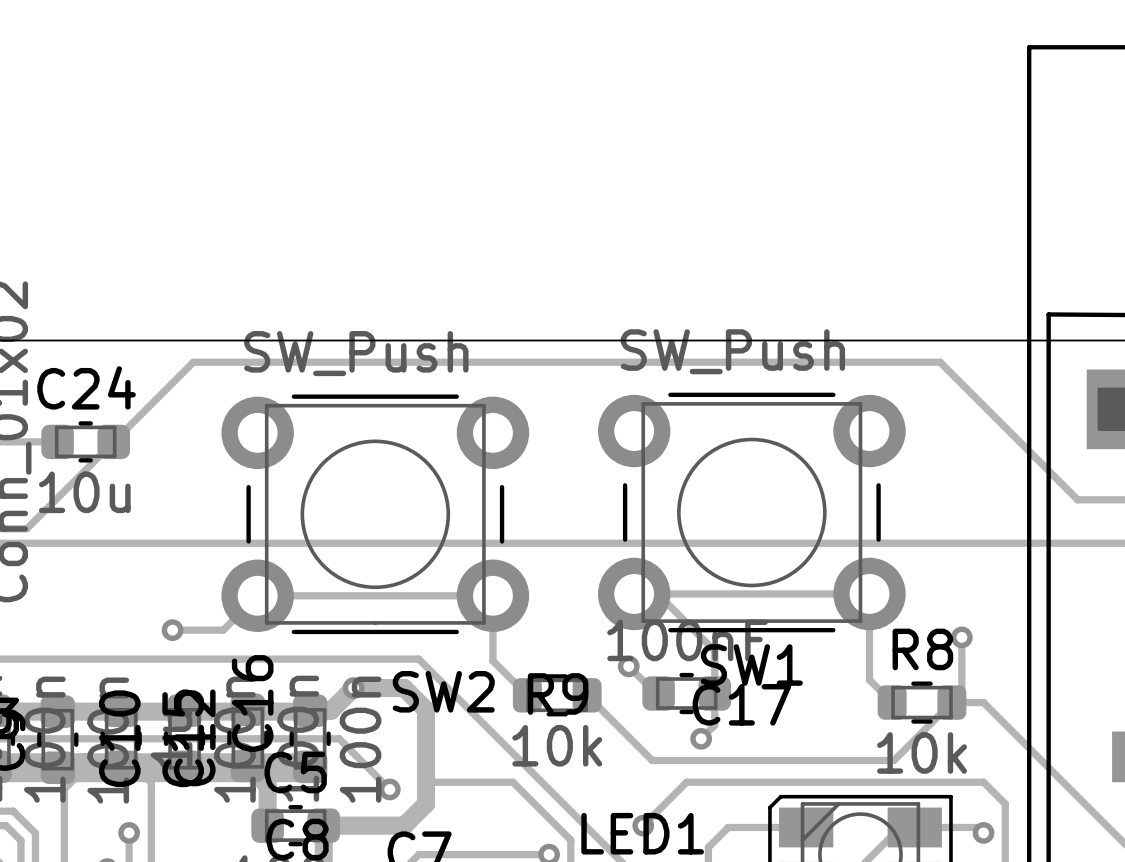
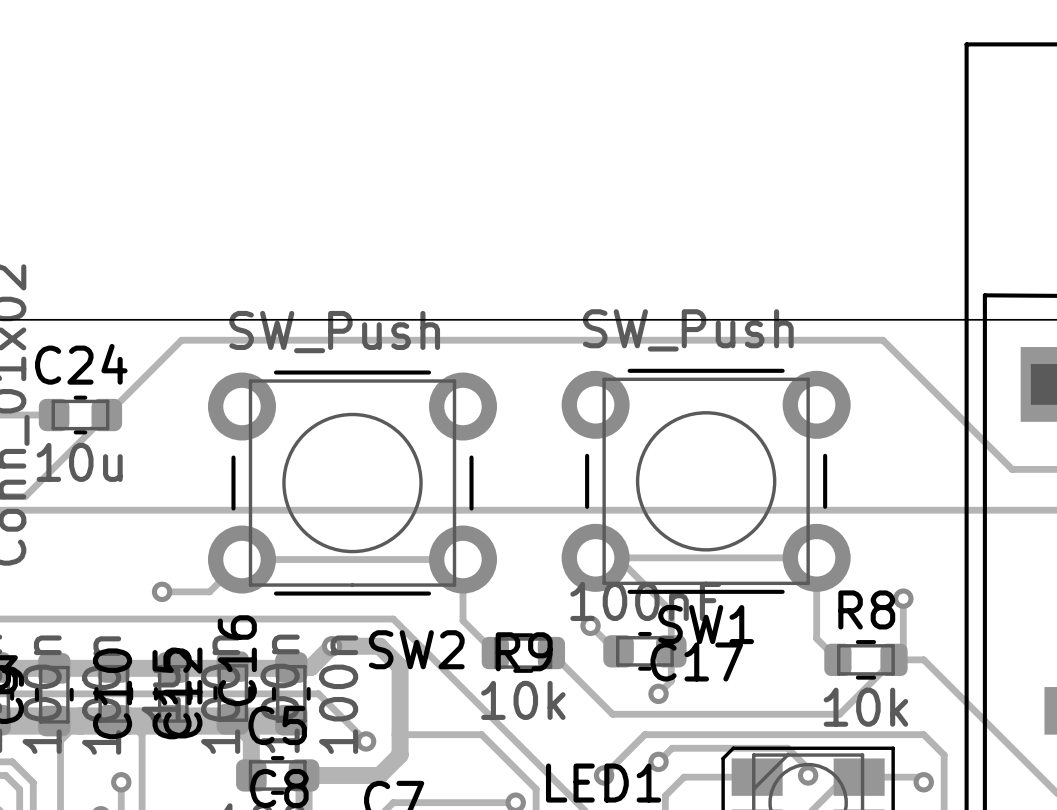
track: none -> (658, 761) (672, 748) (787, 748) (808, 768) (808, 775)
via: none -> (658, 761)
via: none -> (808, 775)

